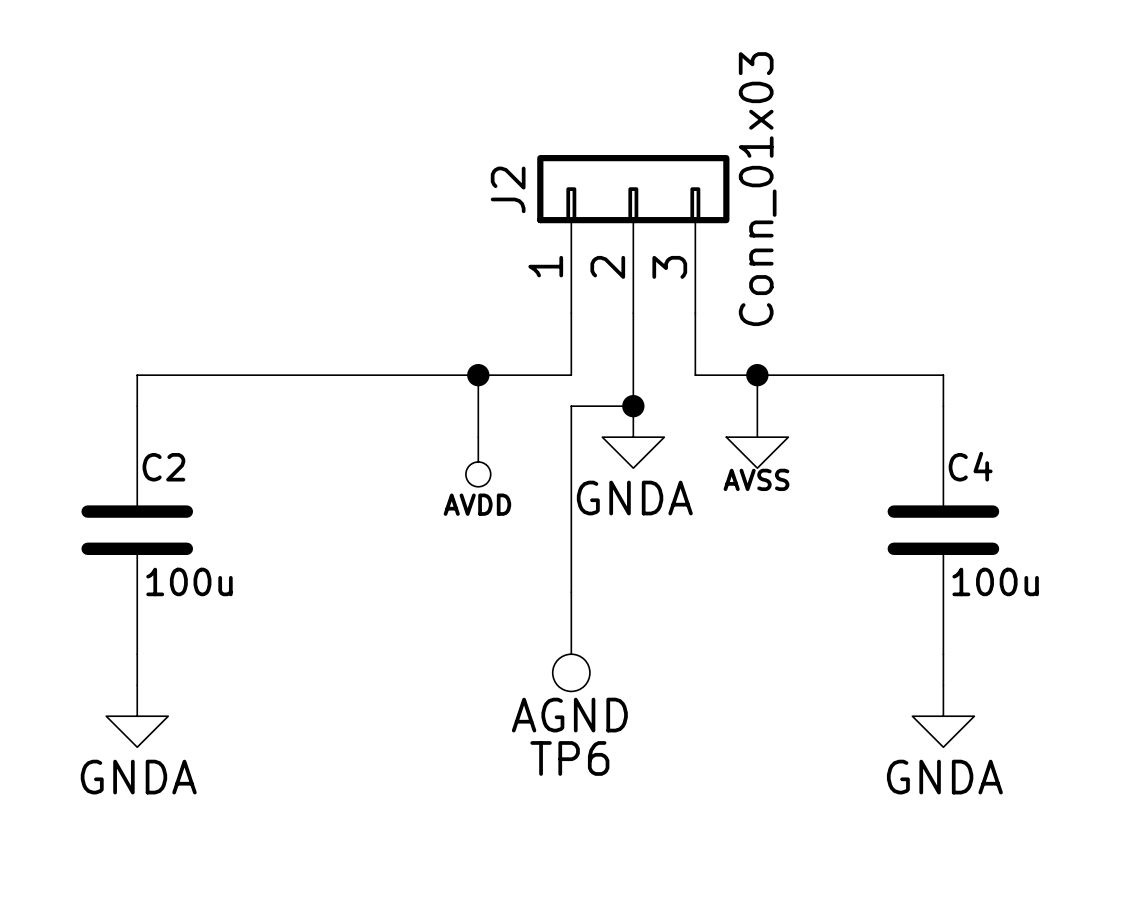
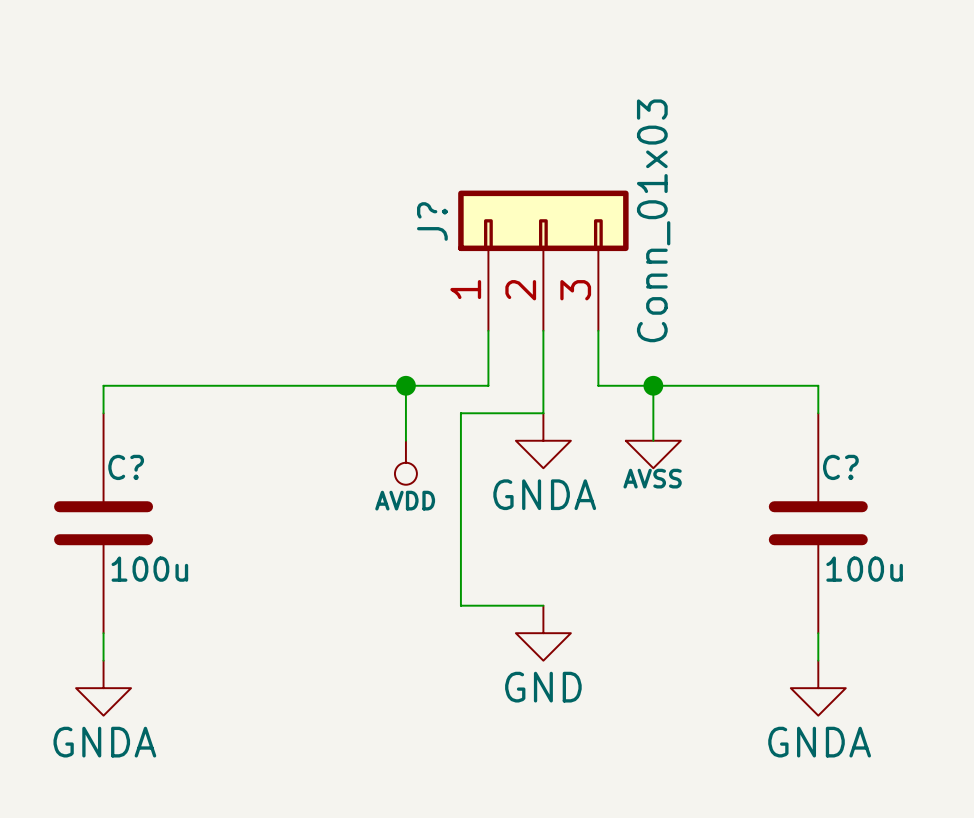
J2 name: J2 (508, 189) -> J? (432, 221)
wire: (571, 406) (571, 592) -> (488, 413) (460, 413) (460, 605) (543, 605)
junction: (633, 406) -> none
C4 name: C4 (970, 466) -> C? (840, 467)
C2 name: C2 (163, 467) -> C? (126, 467)
TP6: AGND (571, 641) -> none
power symbol: none -> GND (543, 633)

